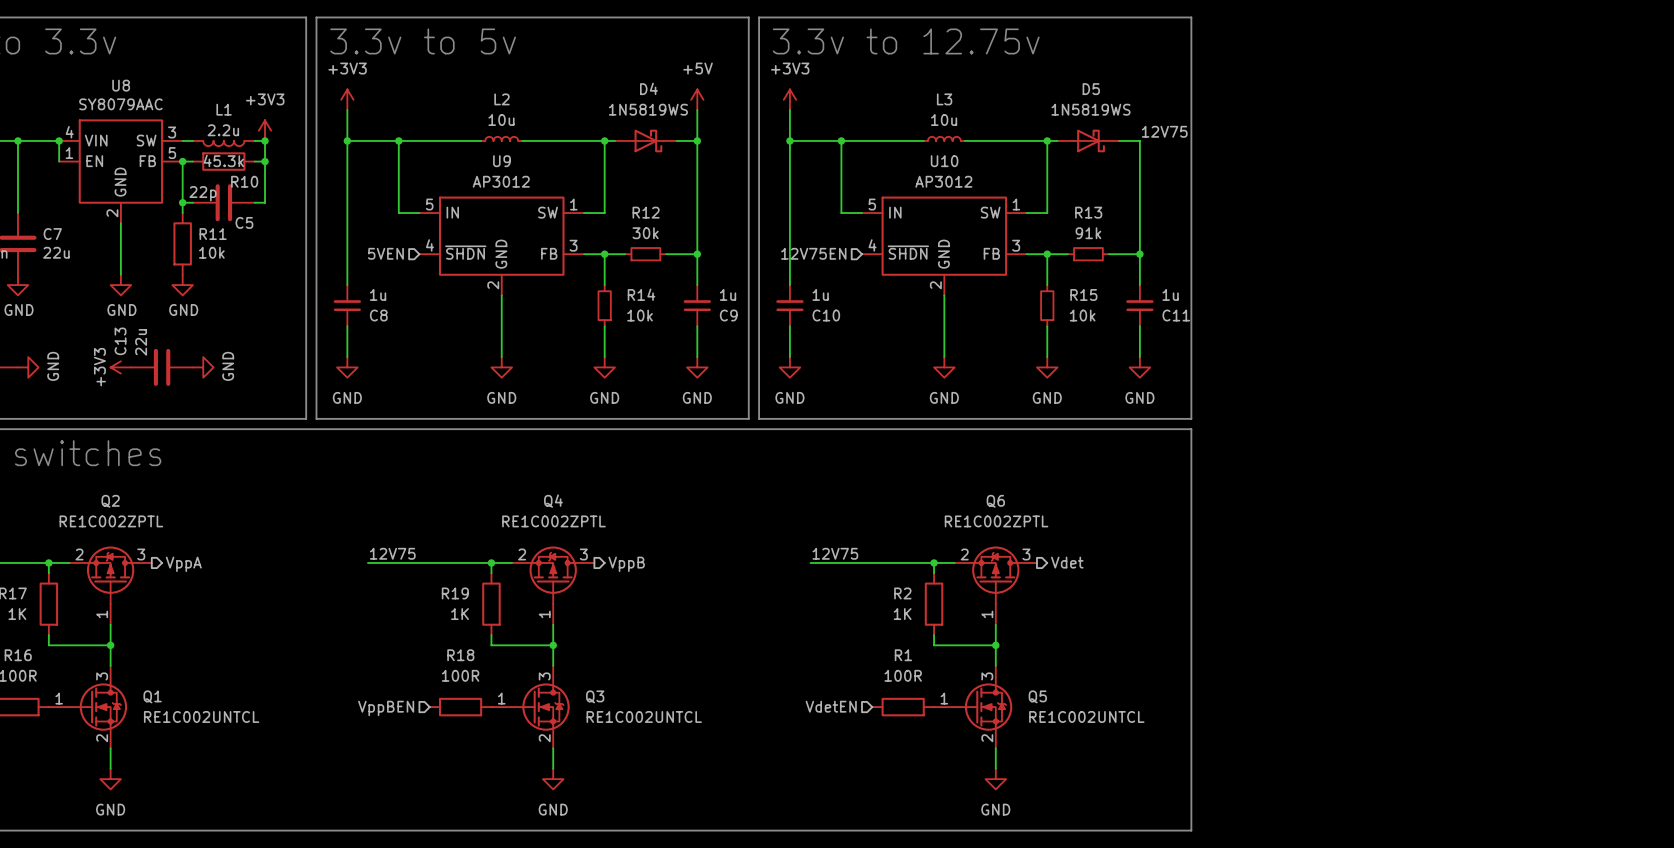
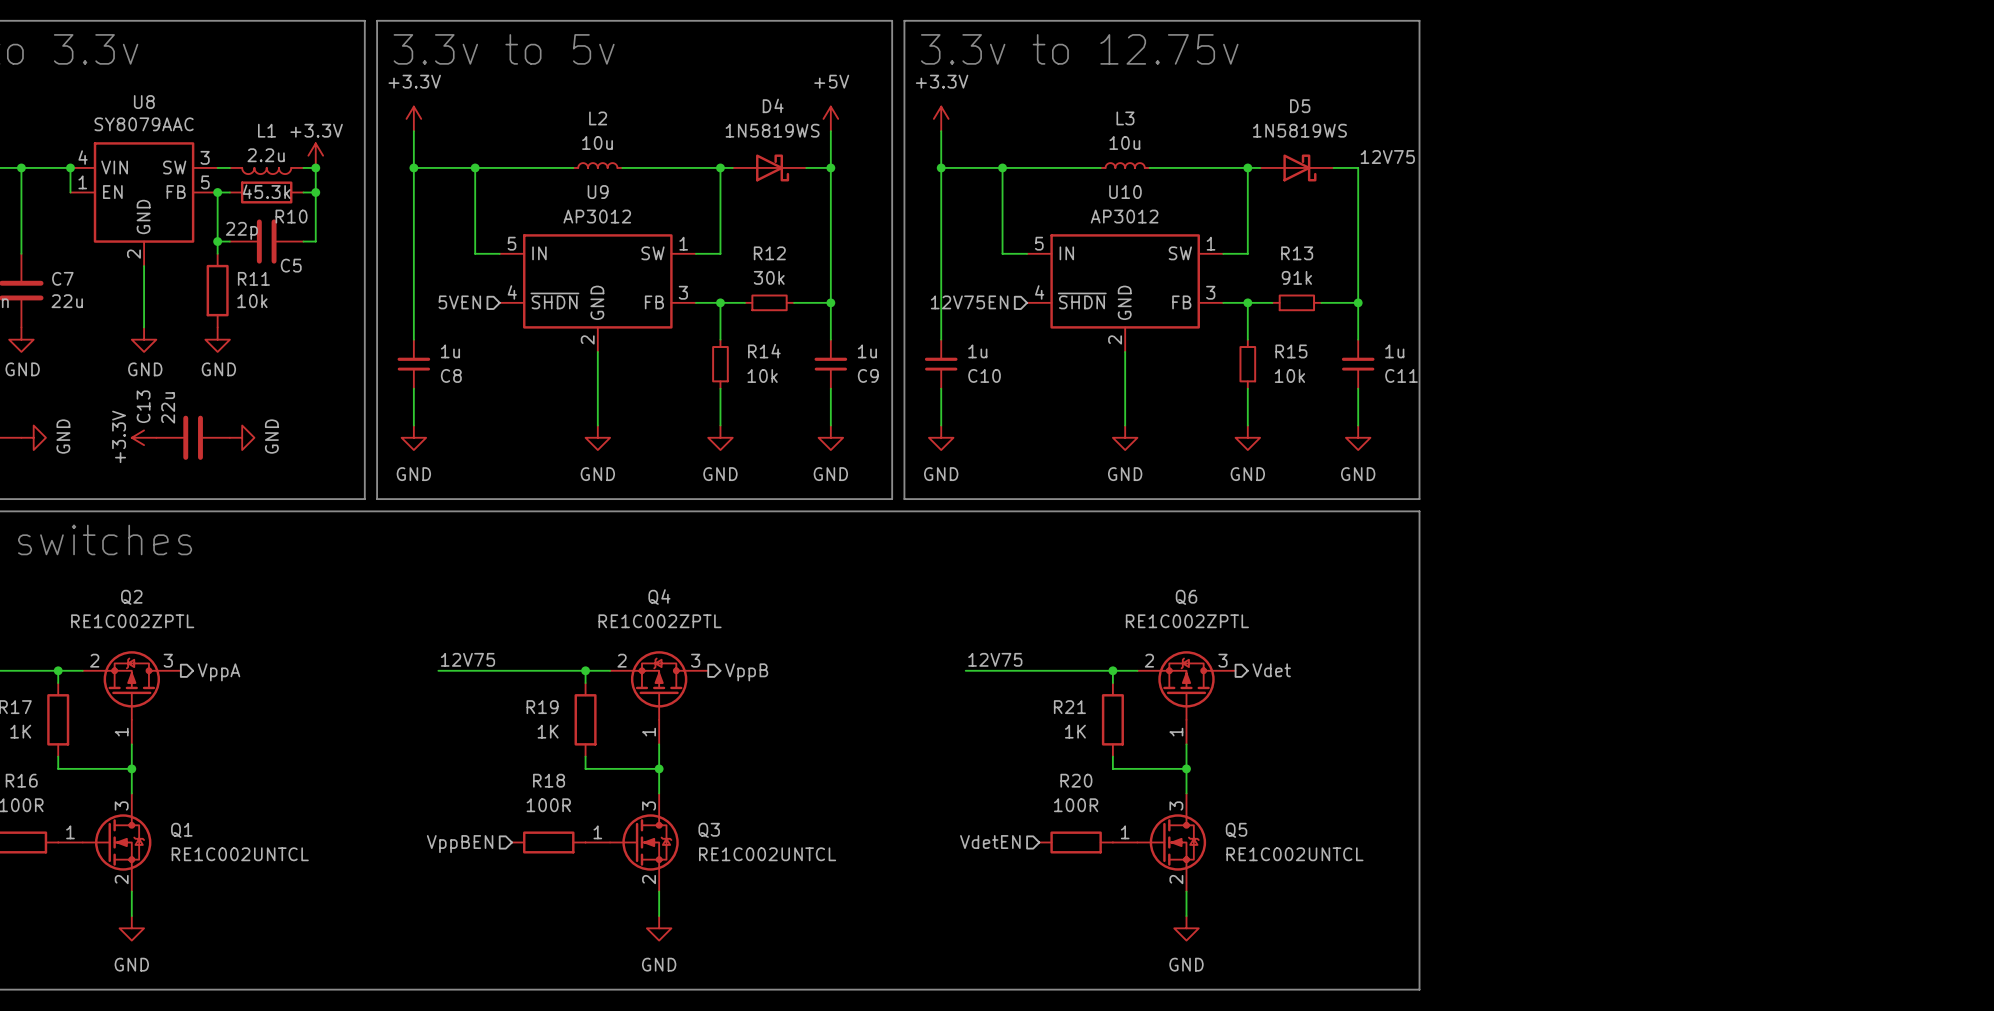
power symbol: +3V3 (347, 99) -> +3.3V (413, 118)
power symbol: +3V3 (789, 99) -> +3.3V (941, 118)
power symbol: +3V3 (265, 130) -> +3.3V (315, 155)
power symbol: +3V3 (120, 367) -> +3.3V (144, 437)
R2 name: R2 (902, 593) -> R21 (1069, 707)
R1 name: R1 (903, 655) -> R20 (1076, 780)

